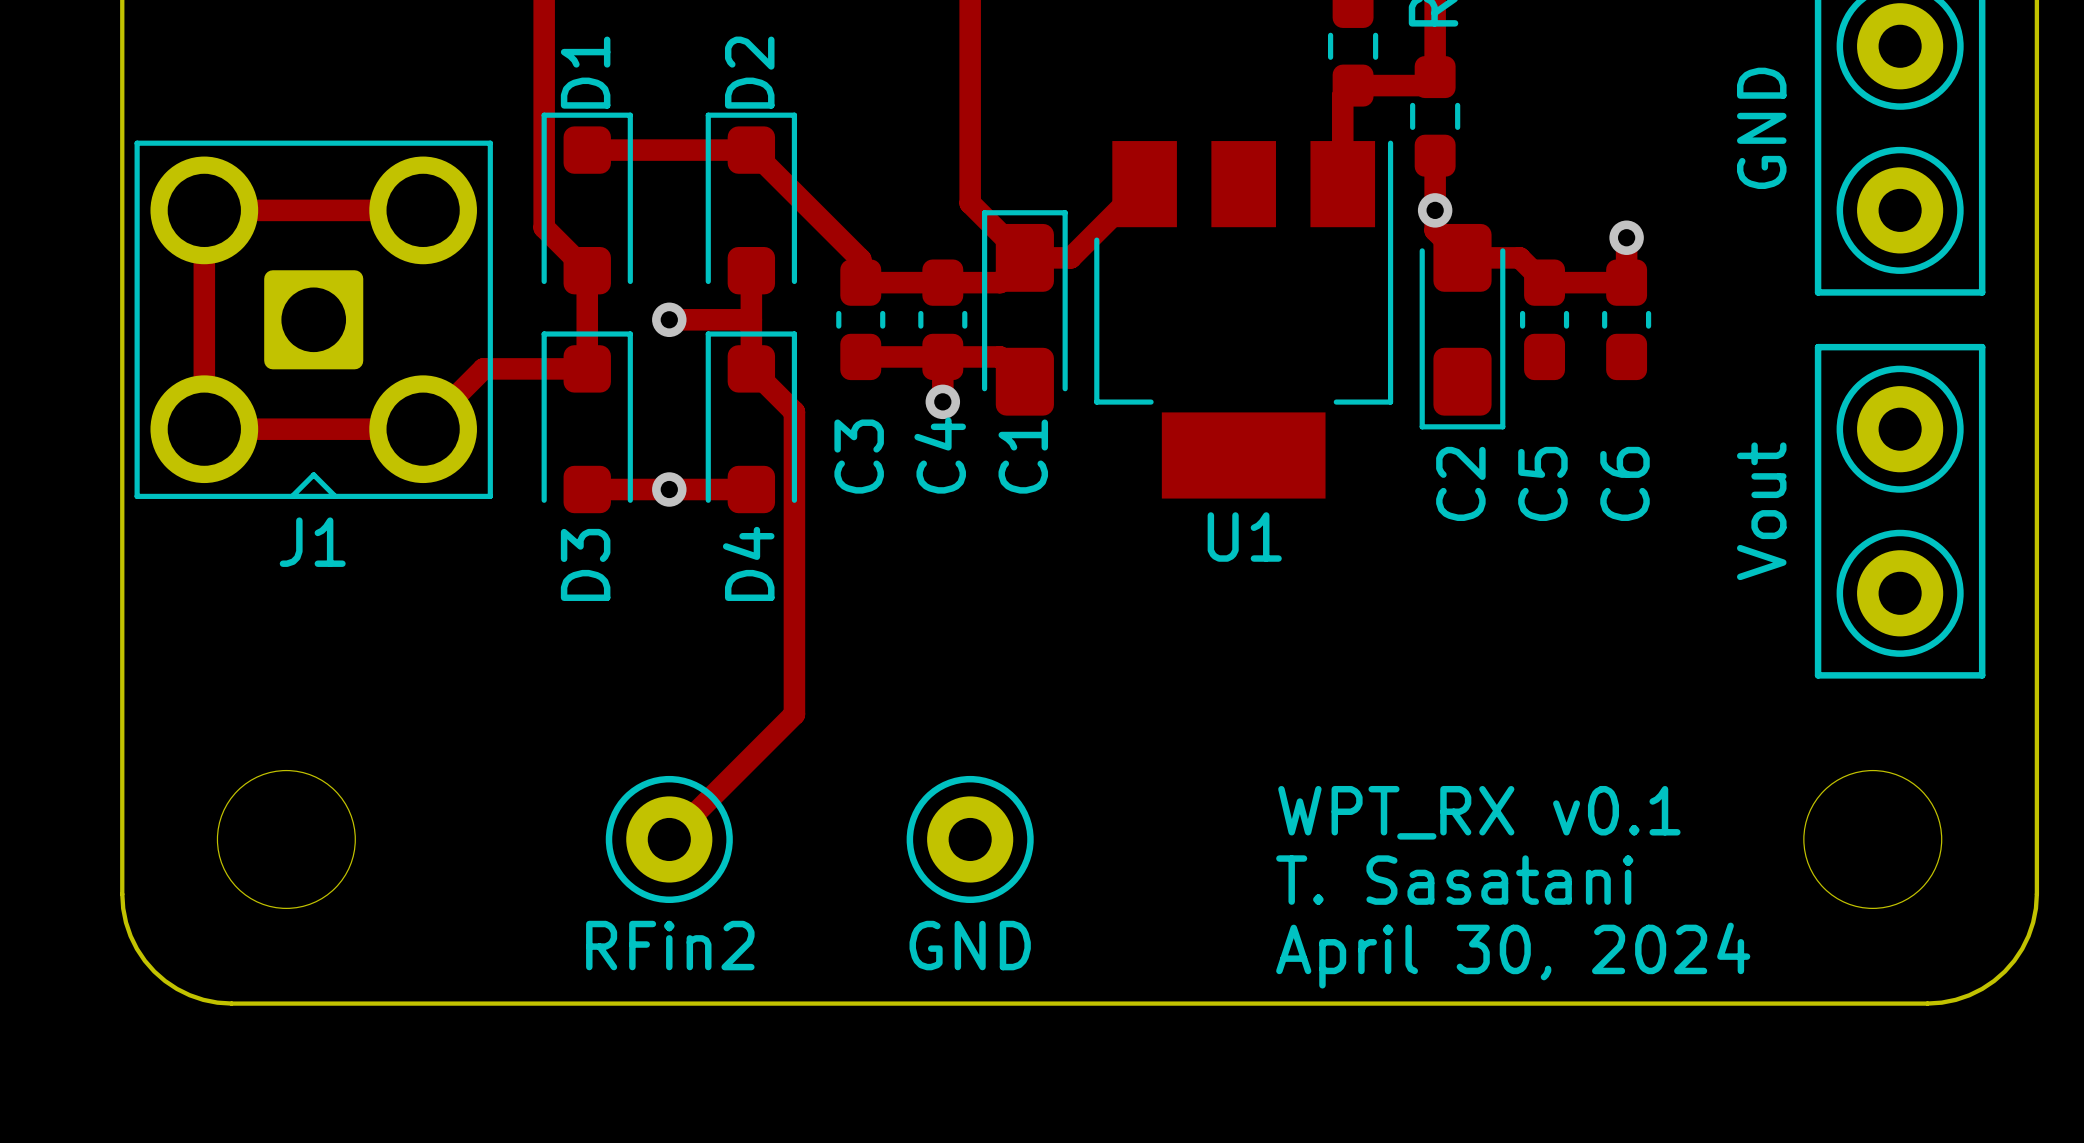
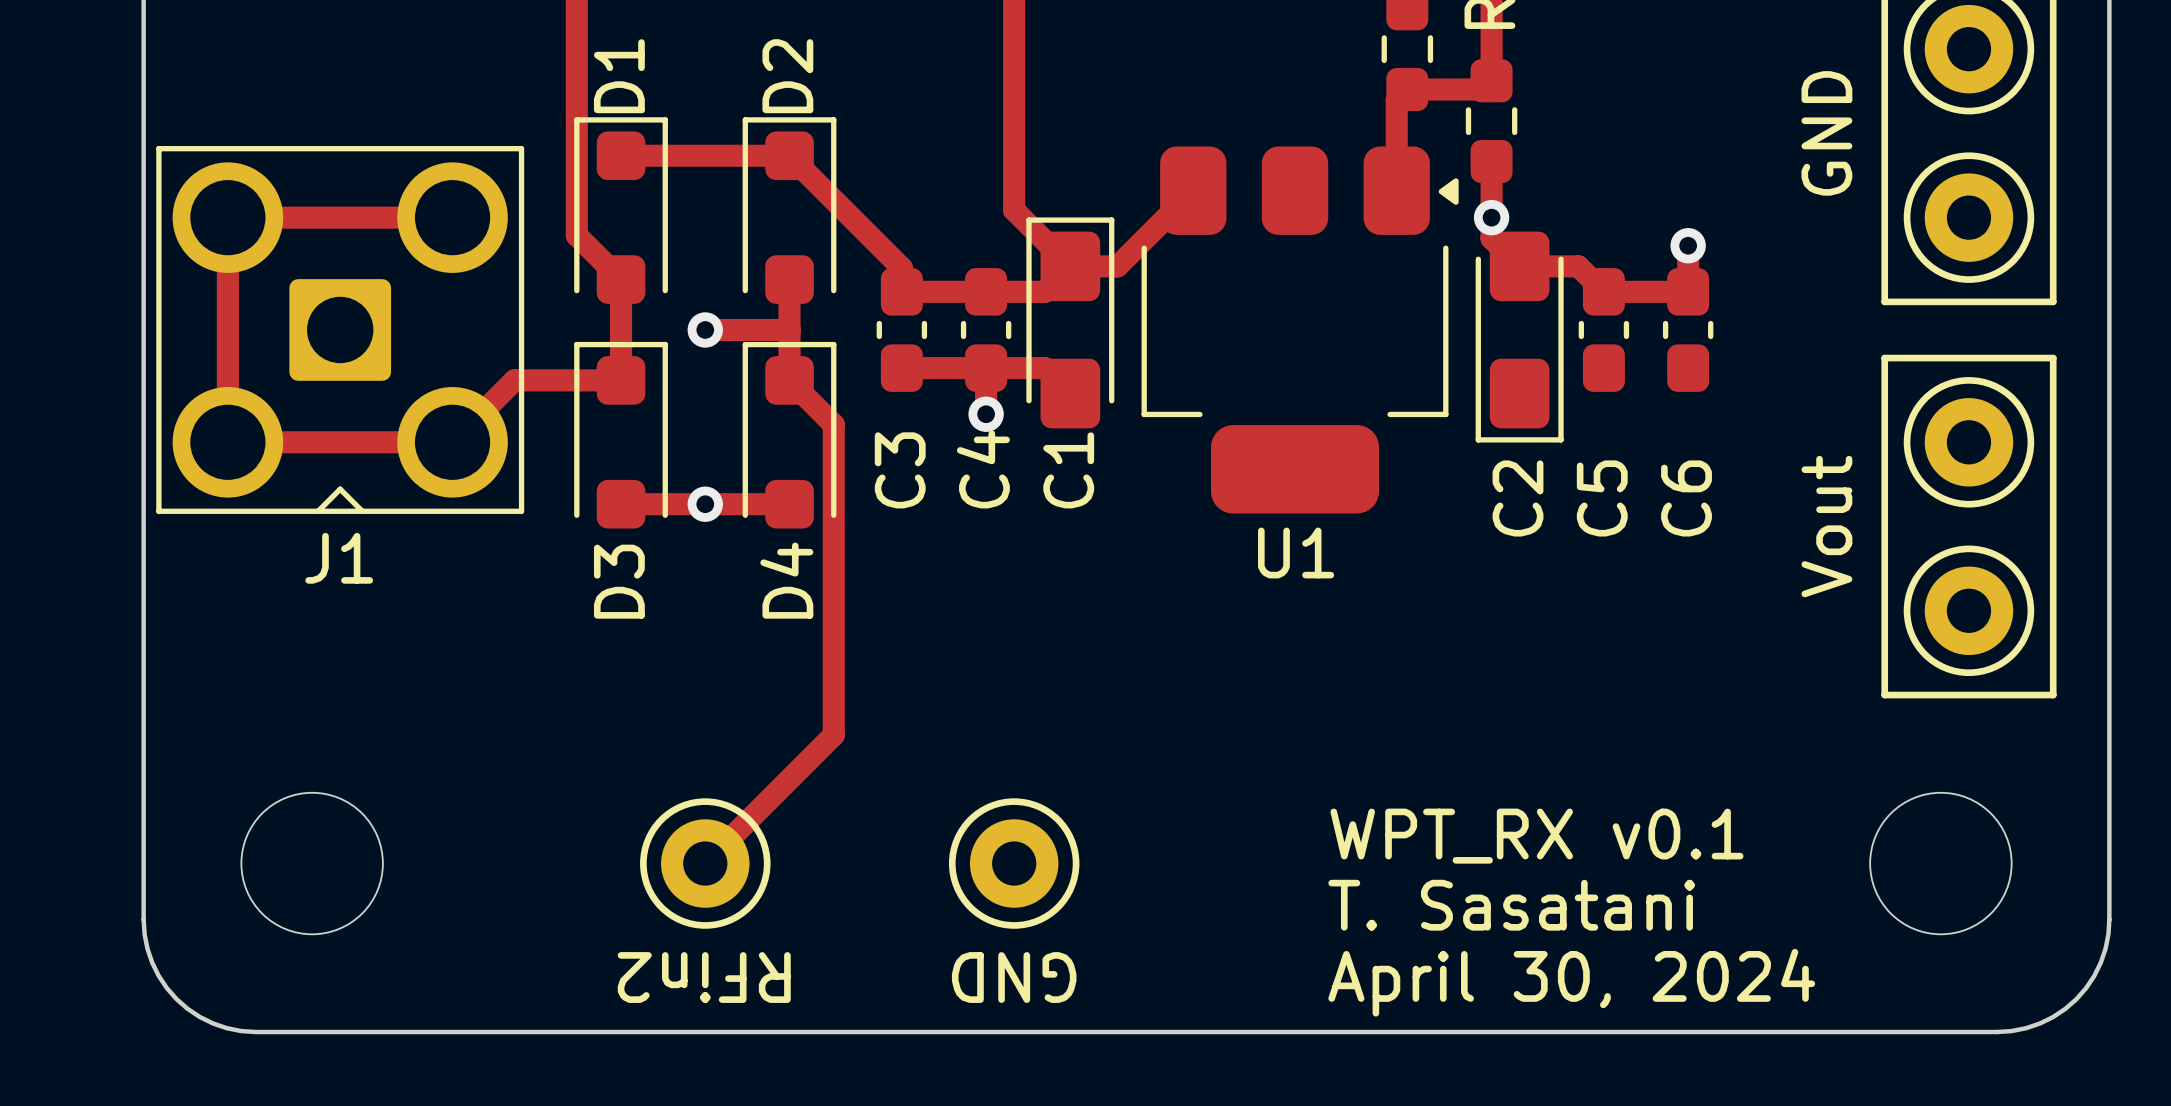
U1 footprint: [1094, 140, 1394, 499] -> [1141, 146, 1459, 514]
RFin2 name: RFin2 (670, 945) -> none
GND name: GND (970, 945) -> none
text: none -> RFin2 (704, 977)
text: none -> GND (1014, 977)

